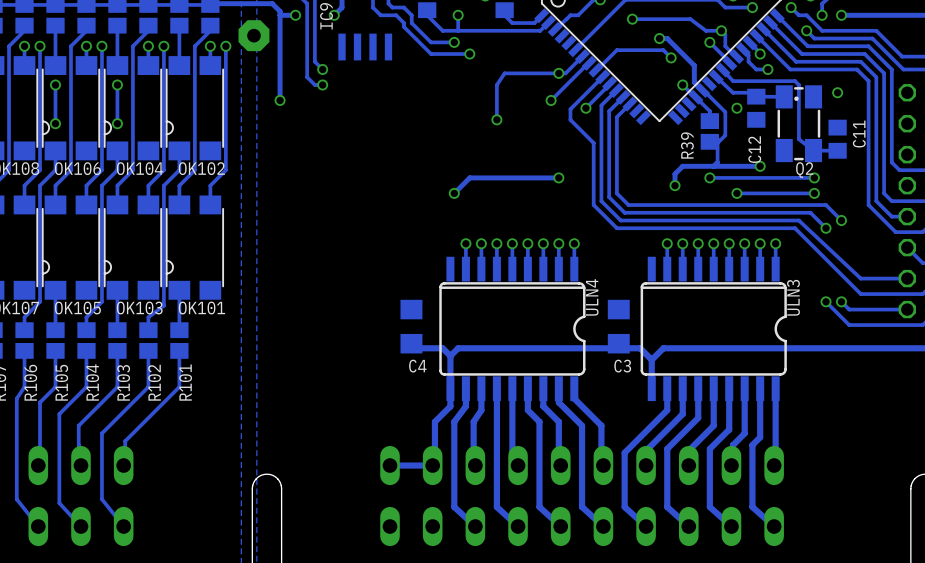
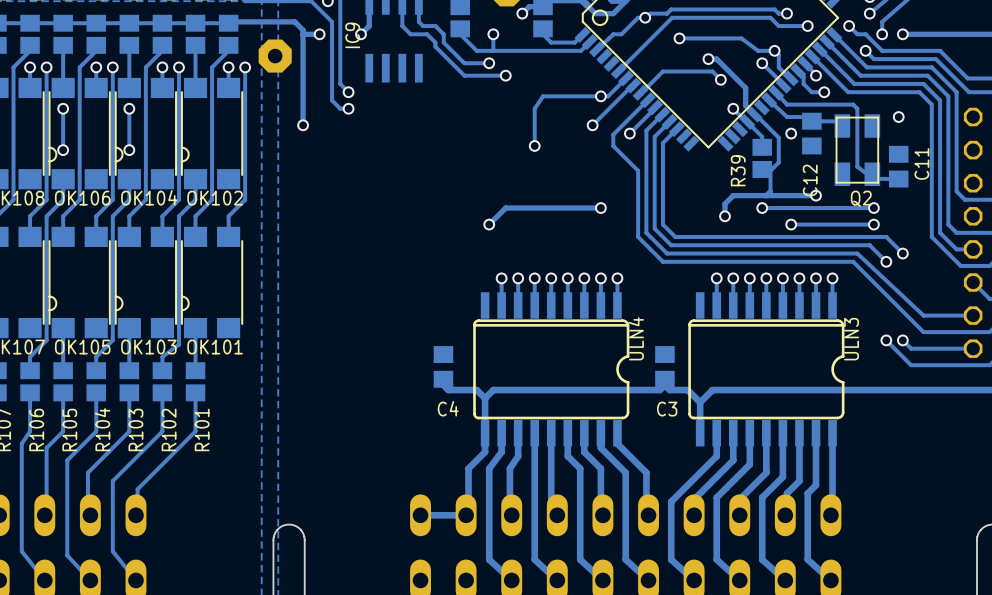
Q2 footprint: [775, 85, 823, 163] -> [834, 114, 881, 186]
C4 footprint: [400, 299, 423, 354] -> [433, 346, 454, 388]
C3 footprint: [607, 299, 630, 354] -> [655, 346, 675, 388]

